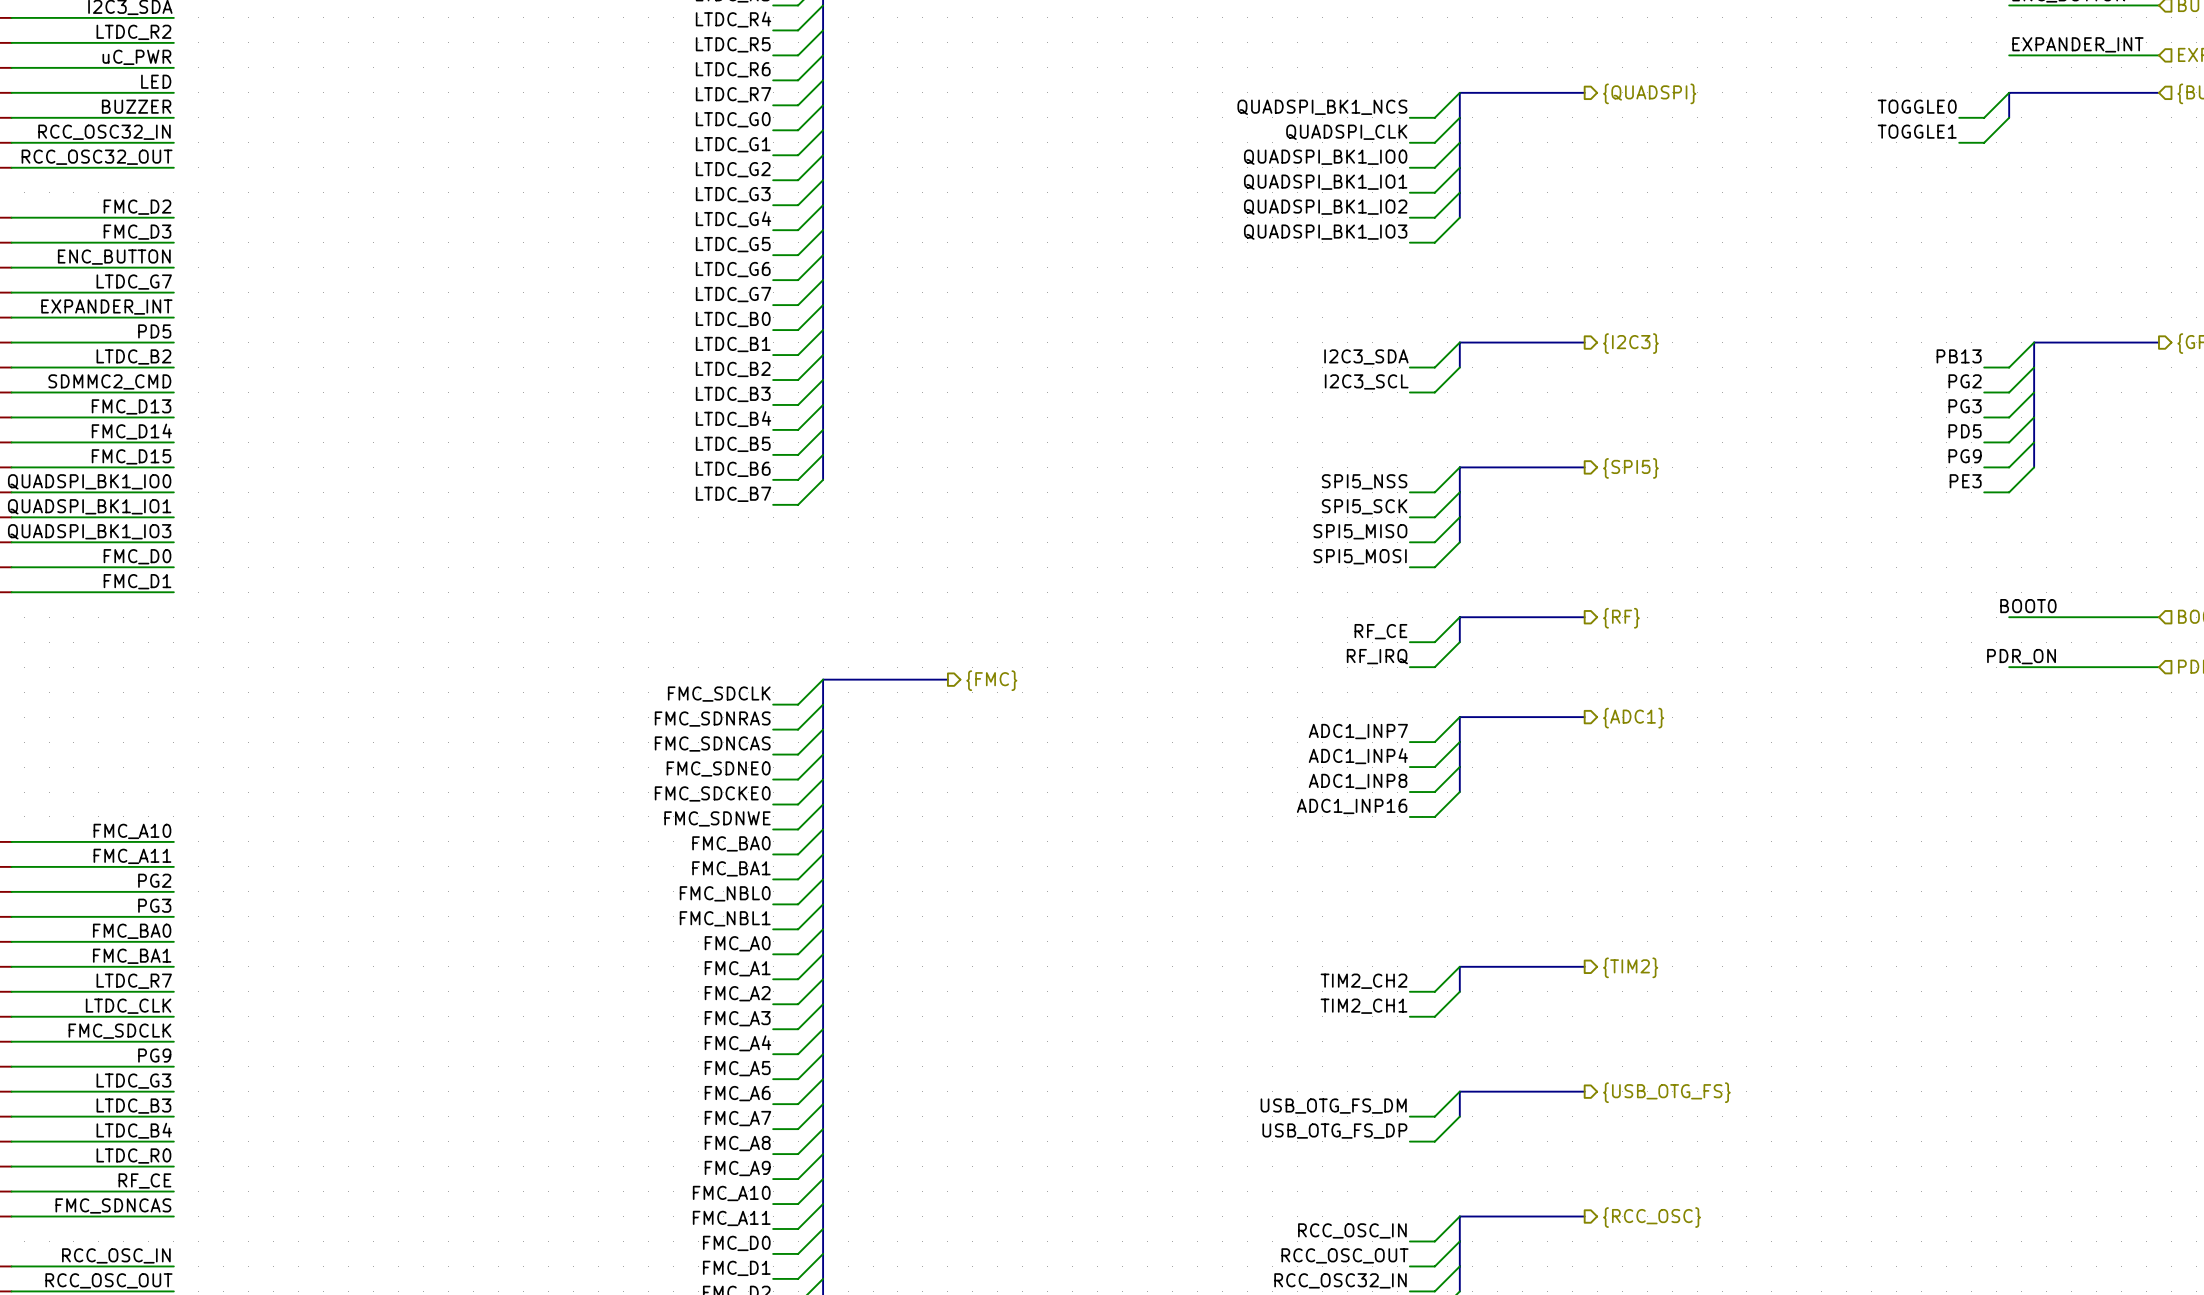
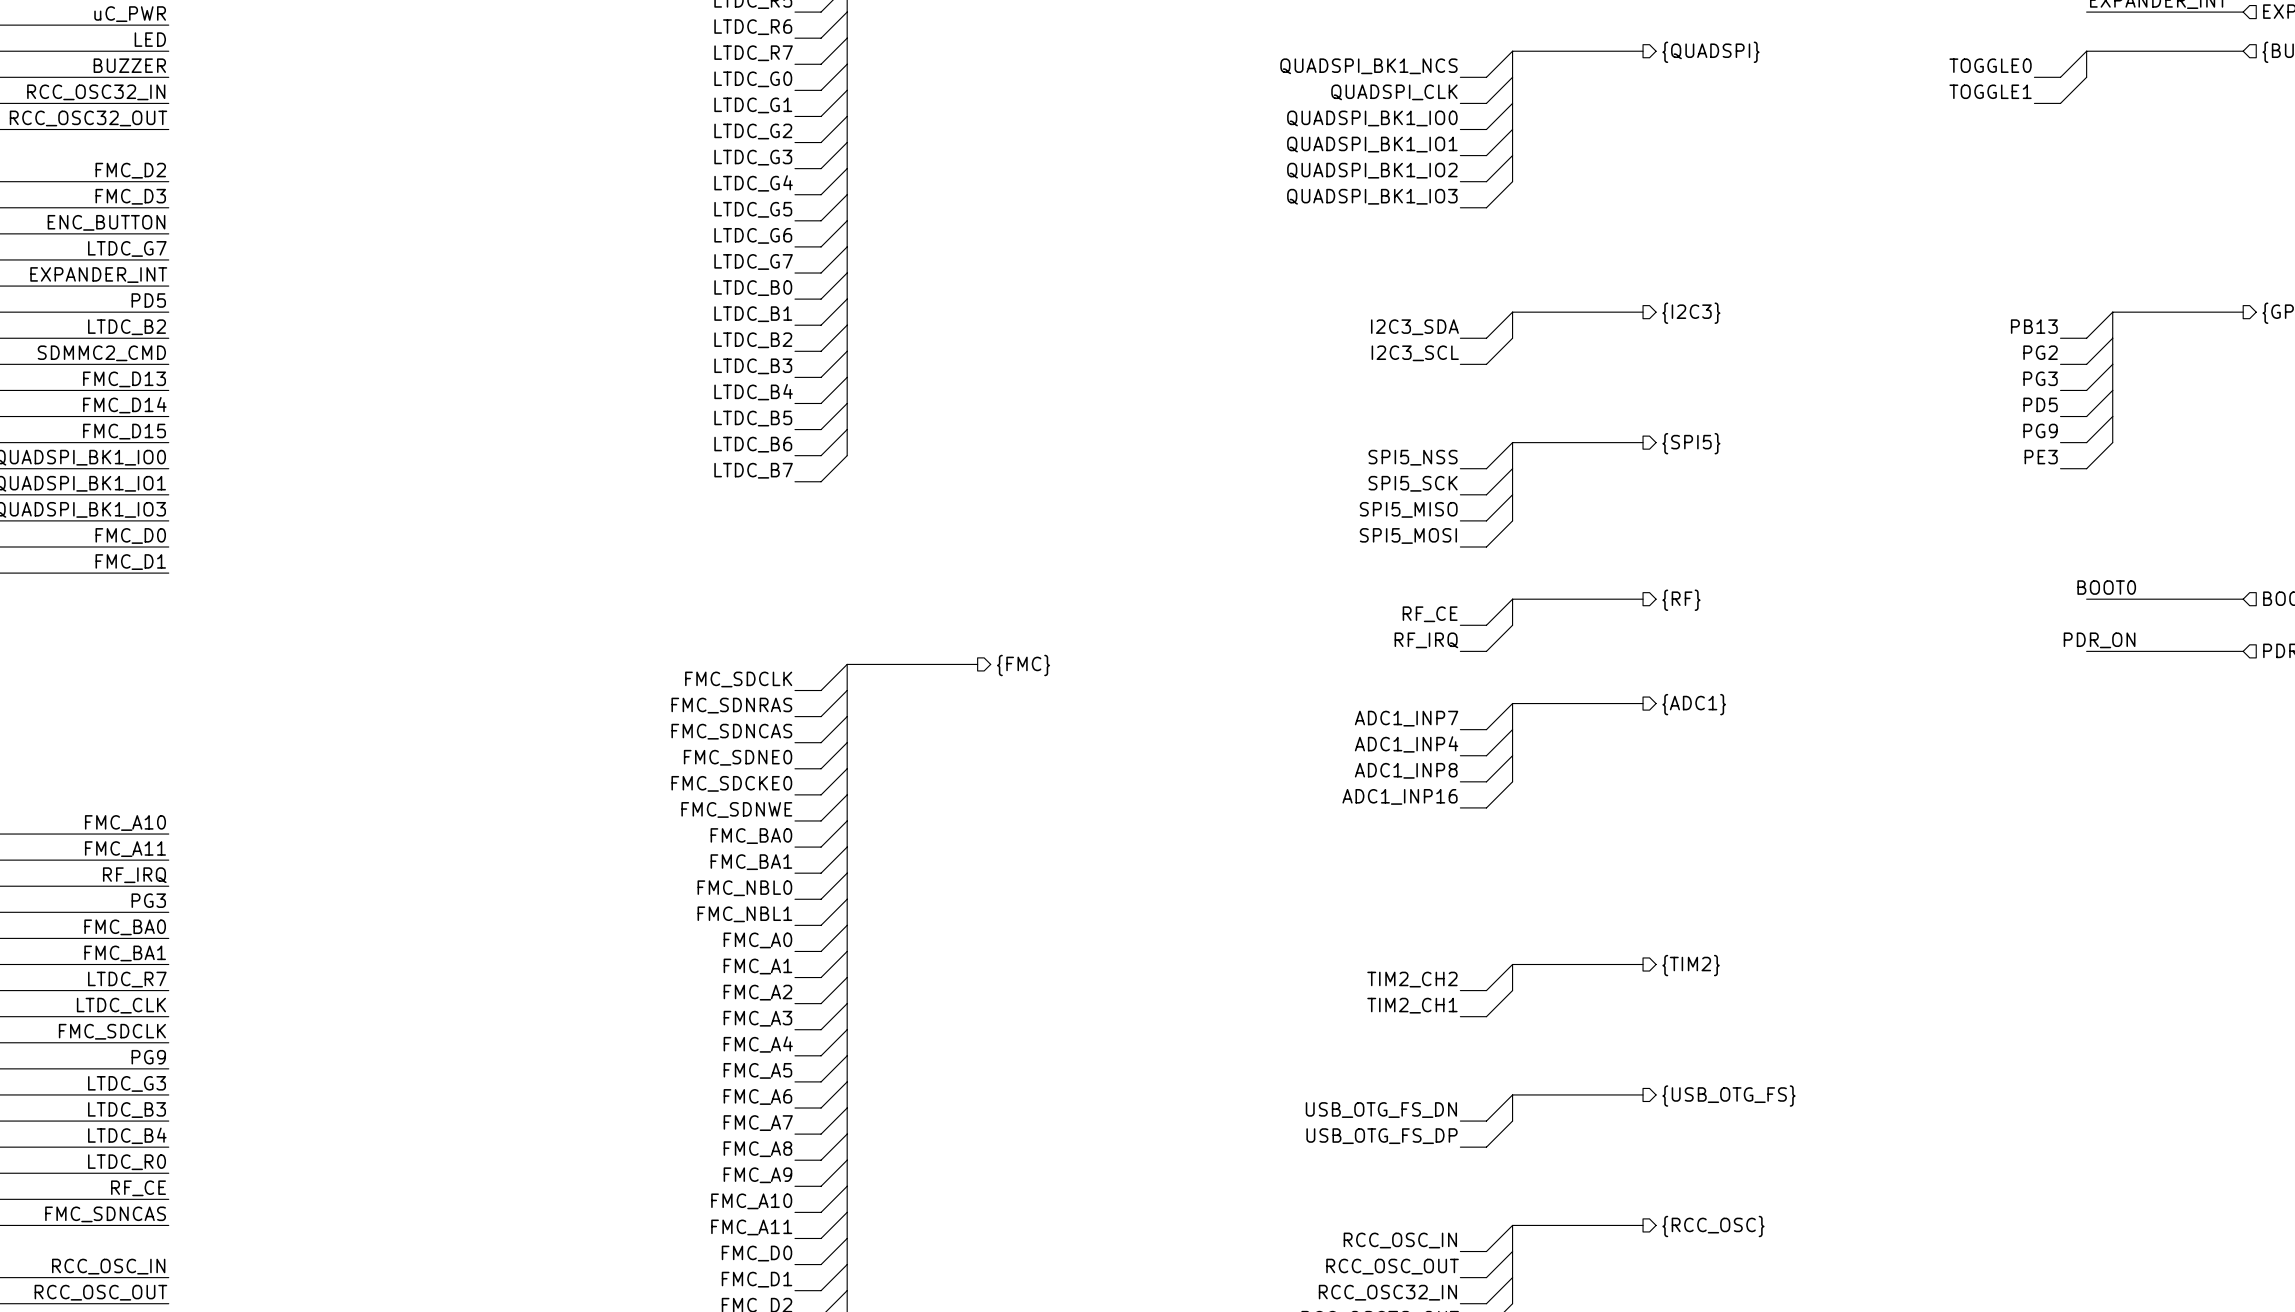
label: PG2 (154, 880) -> RF_IRQ (134, 875)
label: USB_OTG_FS_DM (1333, 1106) -> USB_OTG_FS_DN (1381, 1110)

